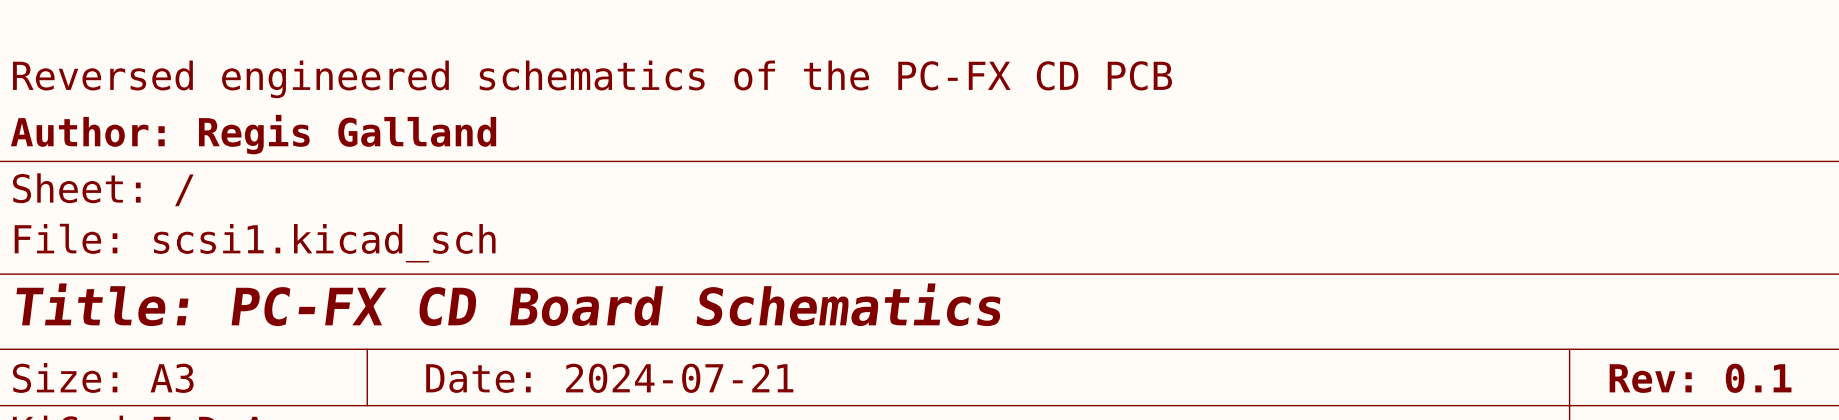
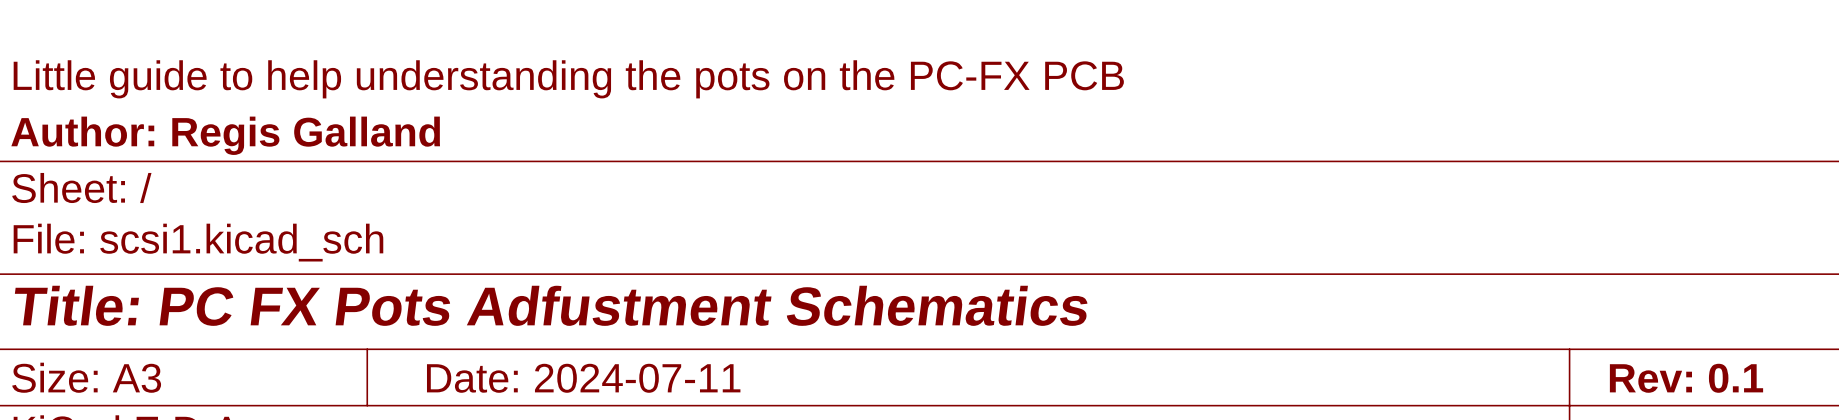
title block: Reversed engineered schematics of the PC-FX CD PCB (592, 79) -> Little guide to help understanding the pots on the PC-FX PCB (568, 79)
title block: Title: PC-FX CD Board Schematics (508, 304) -> Title: PC FX Pots Adfustment Schematics (551, 305)
title block: Date: 2024-07-21 (609, 378) -> Date: 2024-07-11 (583, 378)

